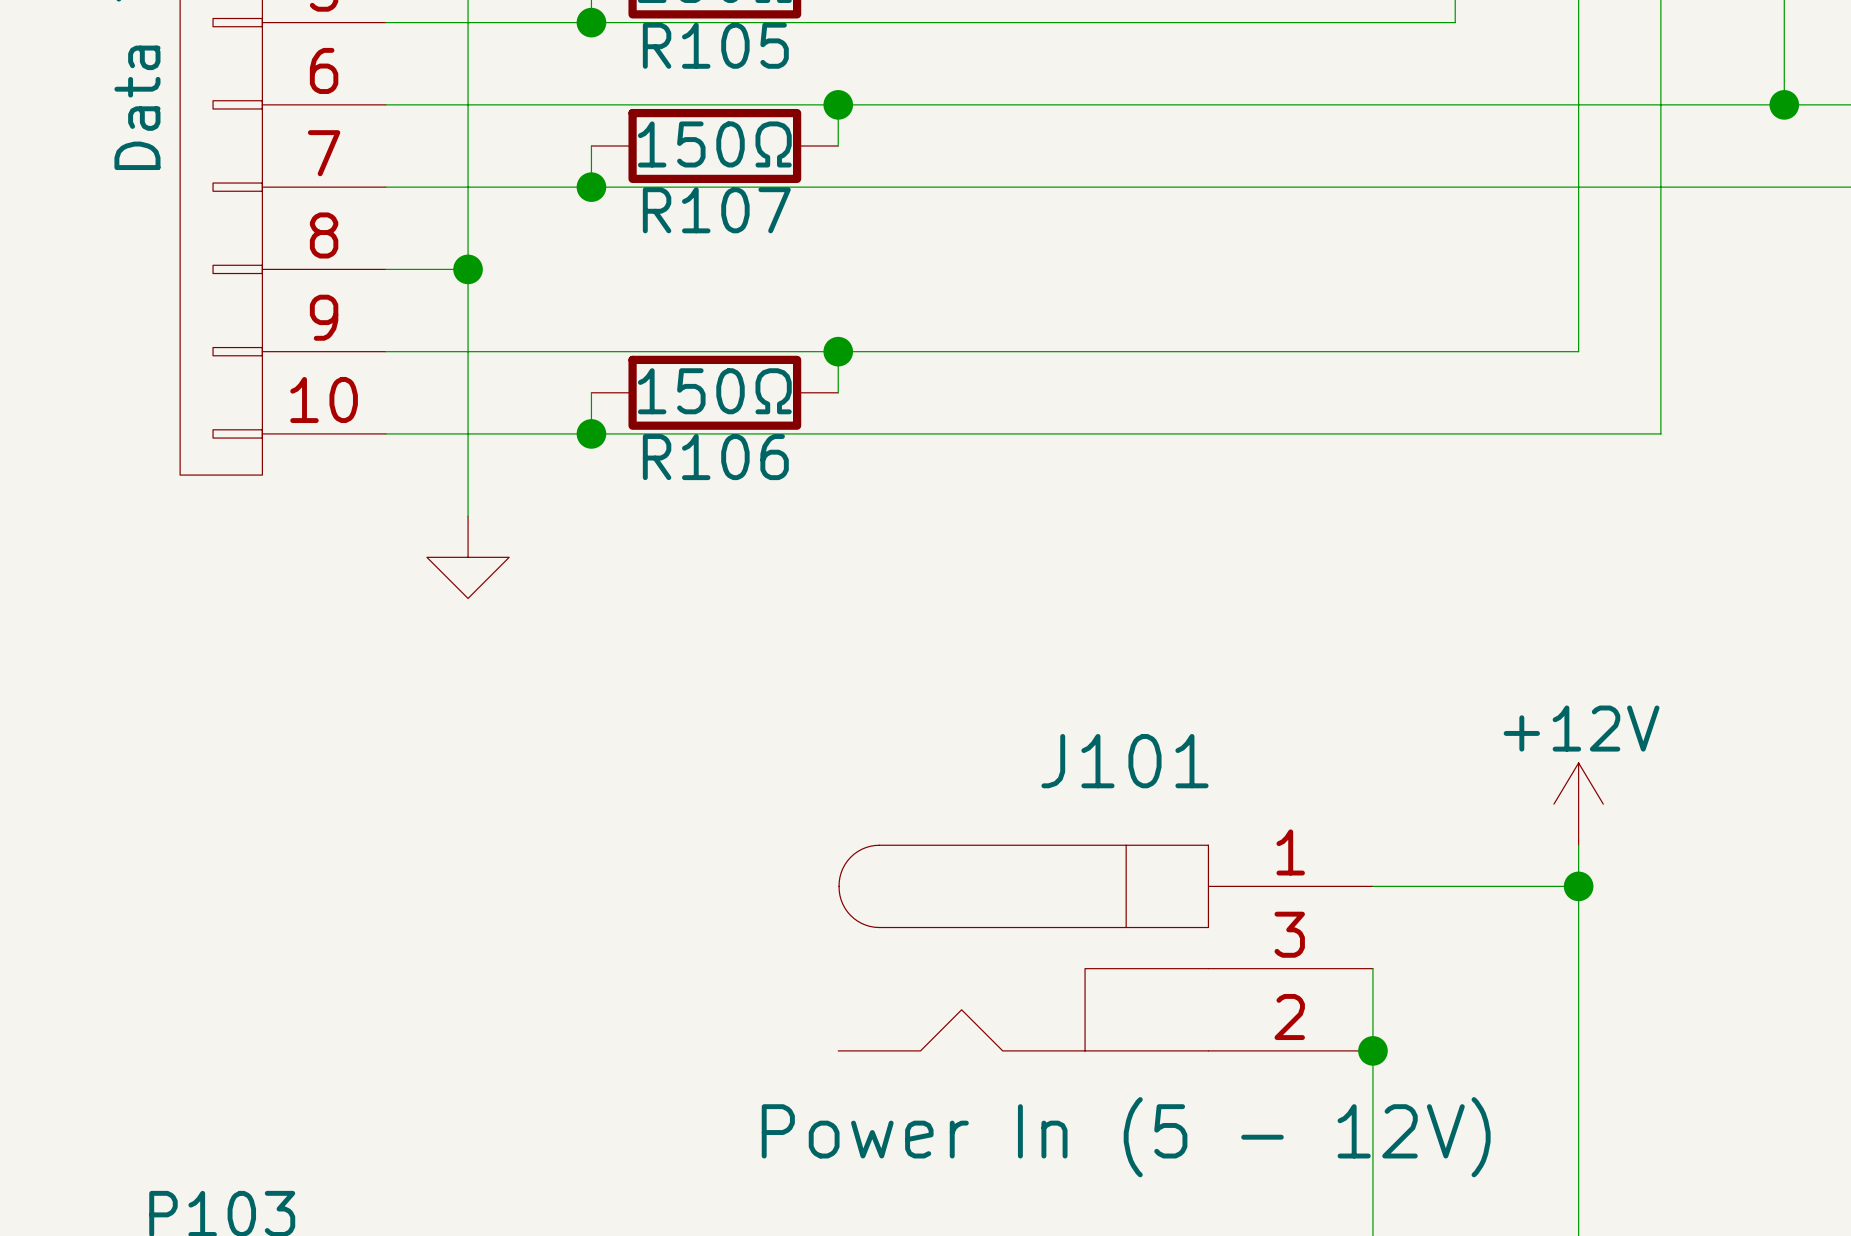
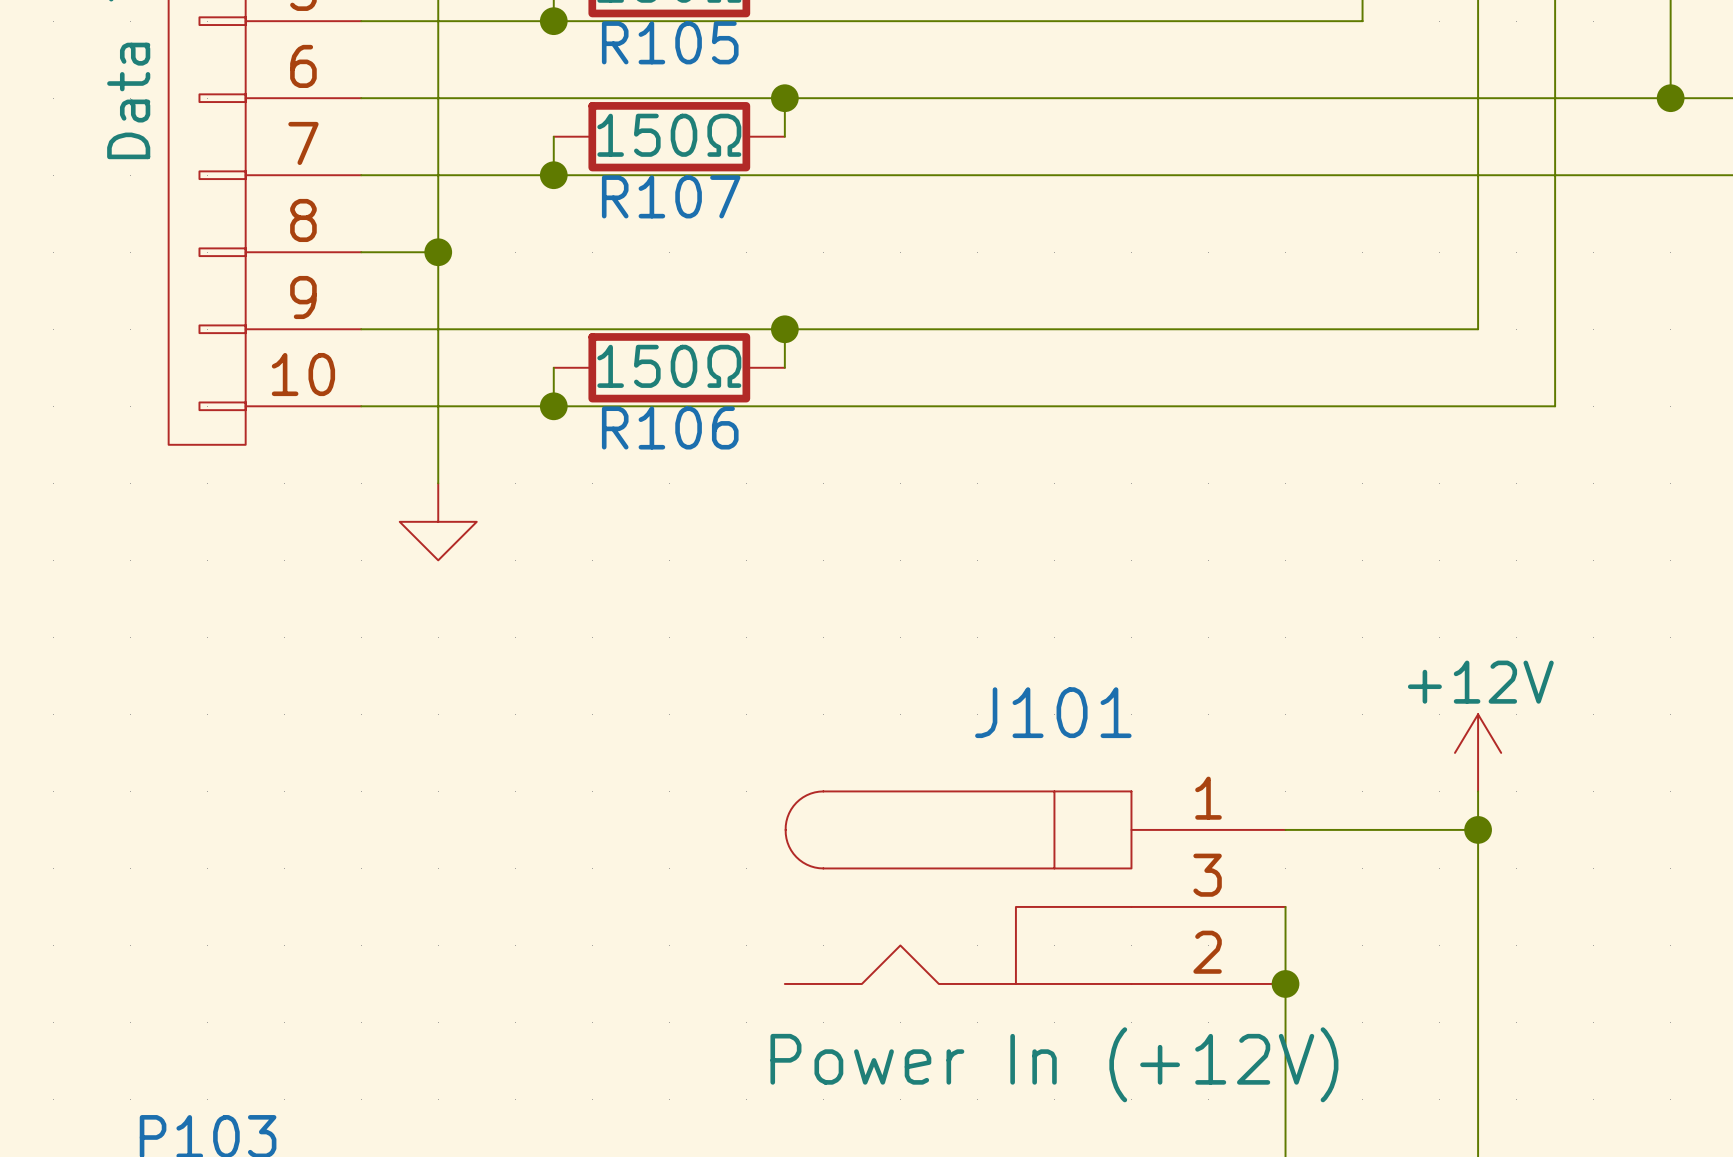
J101 value: Power In (5 - 12V) (1126, 1137) -> Power In (+12V) (1054, 1064)

